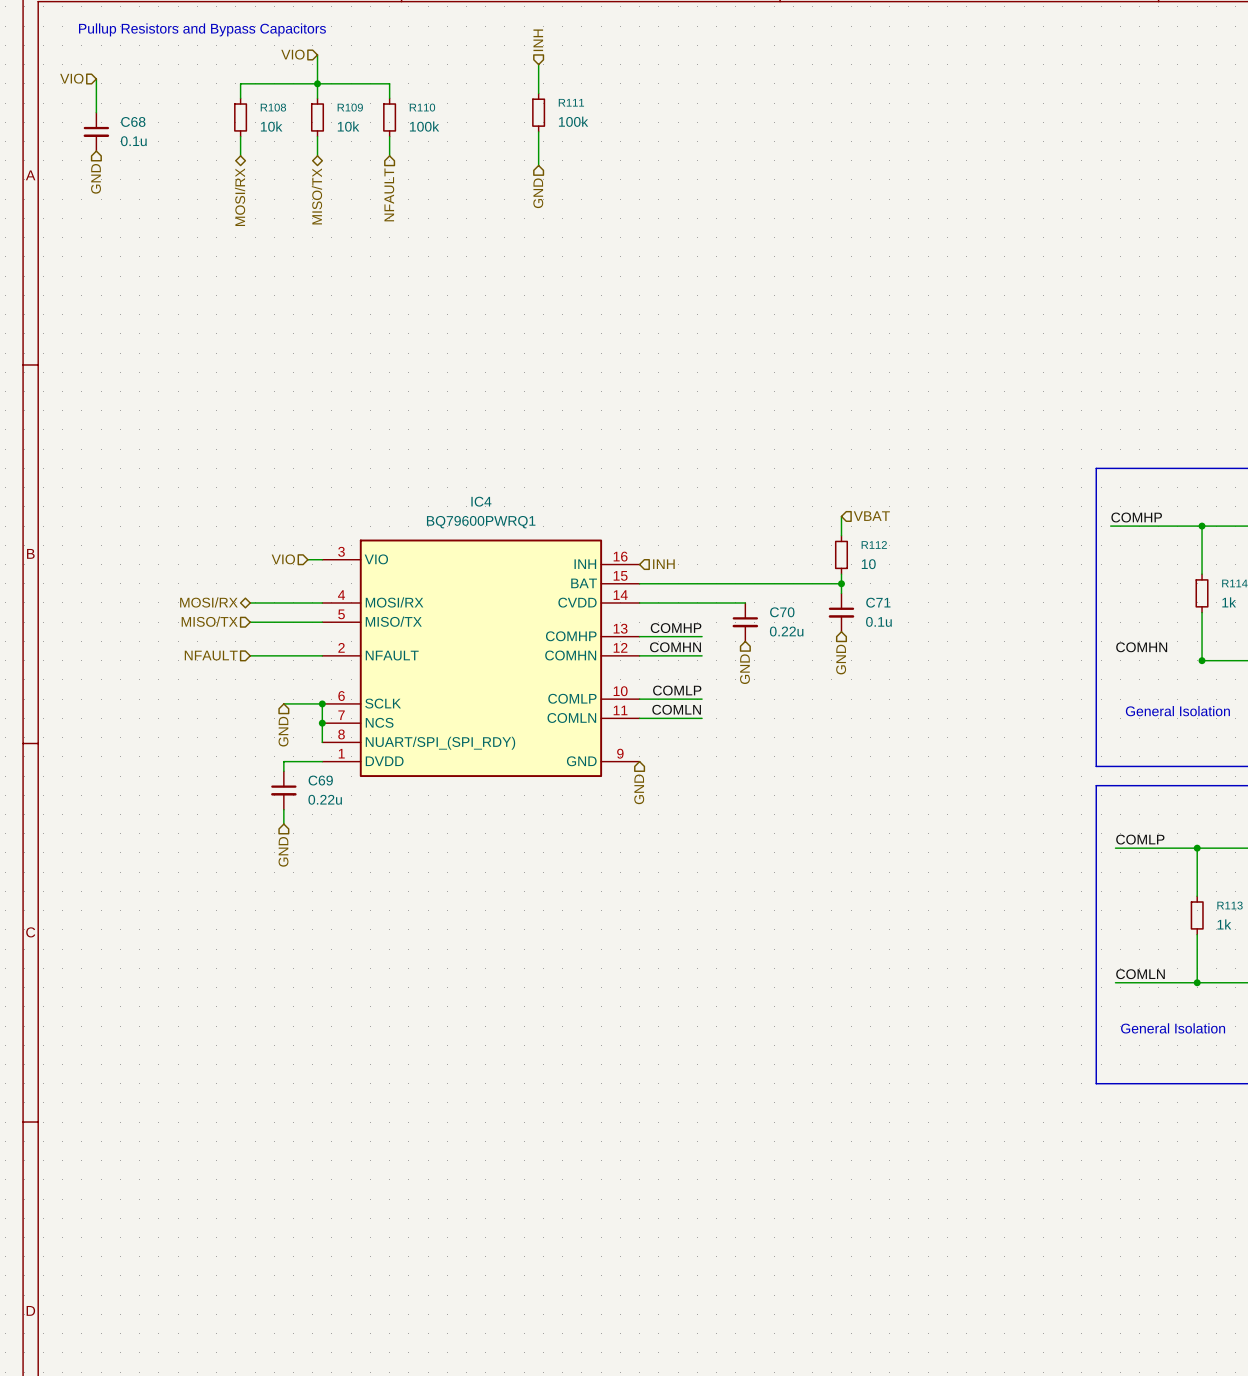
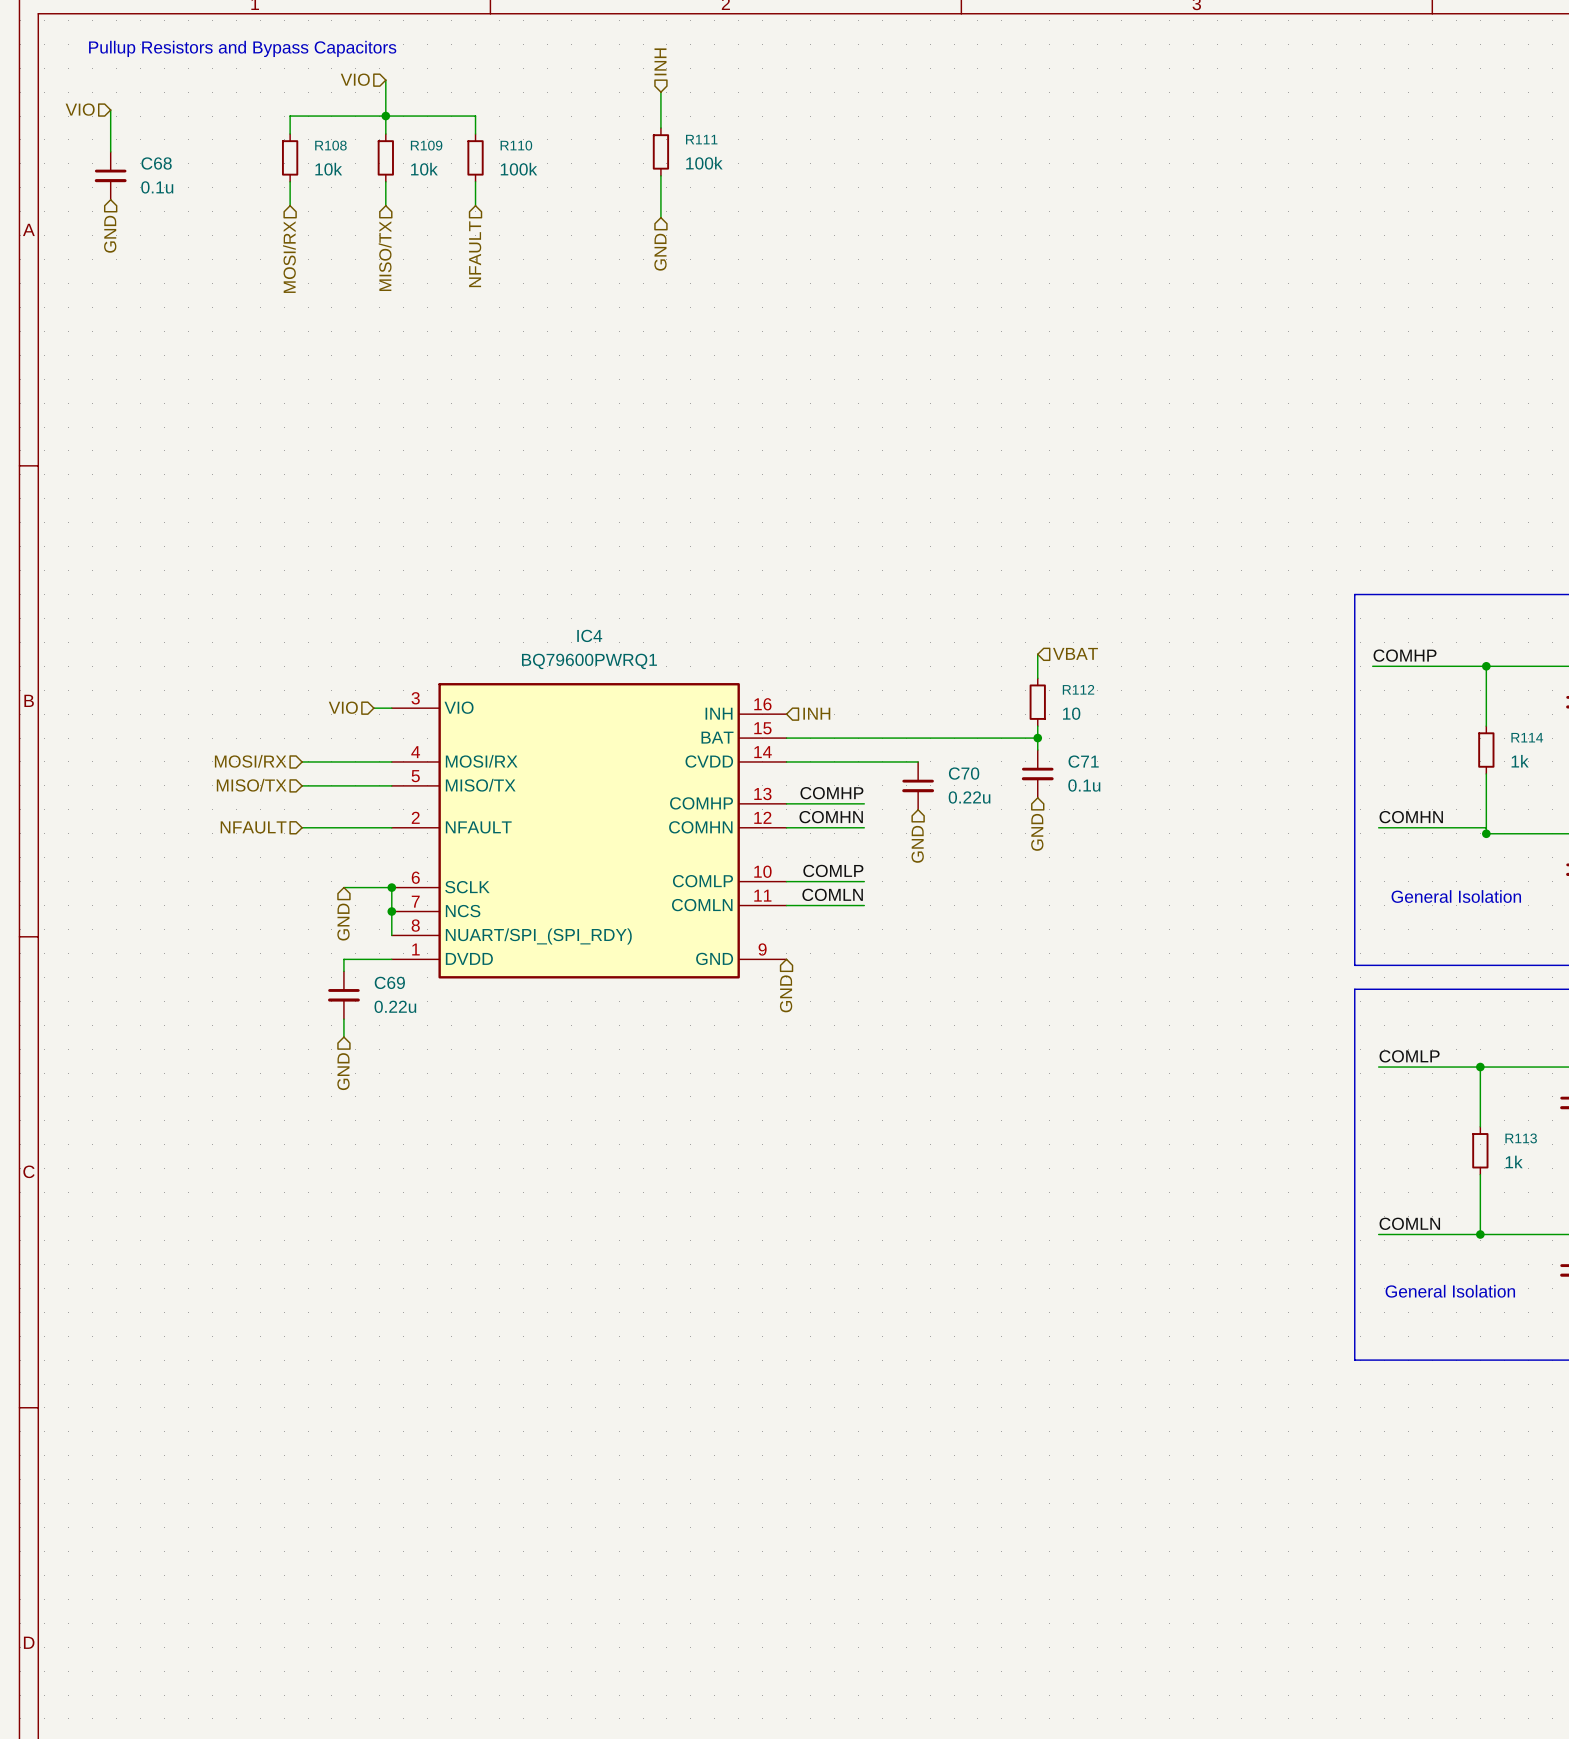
hierarchical label shape: bidirectional (316, 196) -> input (385, 256)
hierarchical label shape: bidirectional (240, 197) -> input (289, 257)
hierarchical label shape: bidirectional (208, 602) -> input (250, 761)
wire: none -> (1378, 827) (1486, 827)

